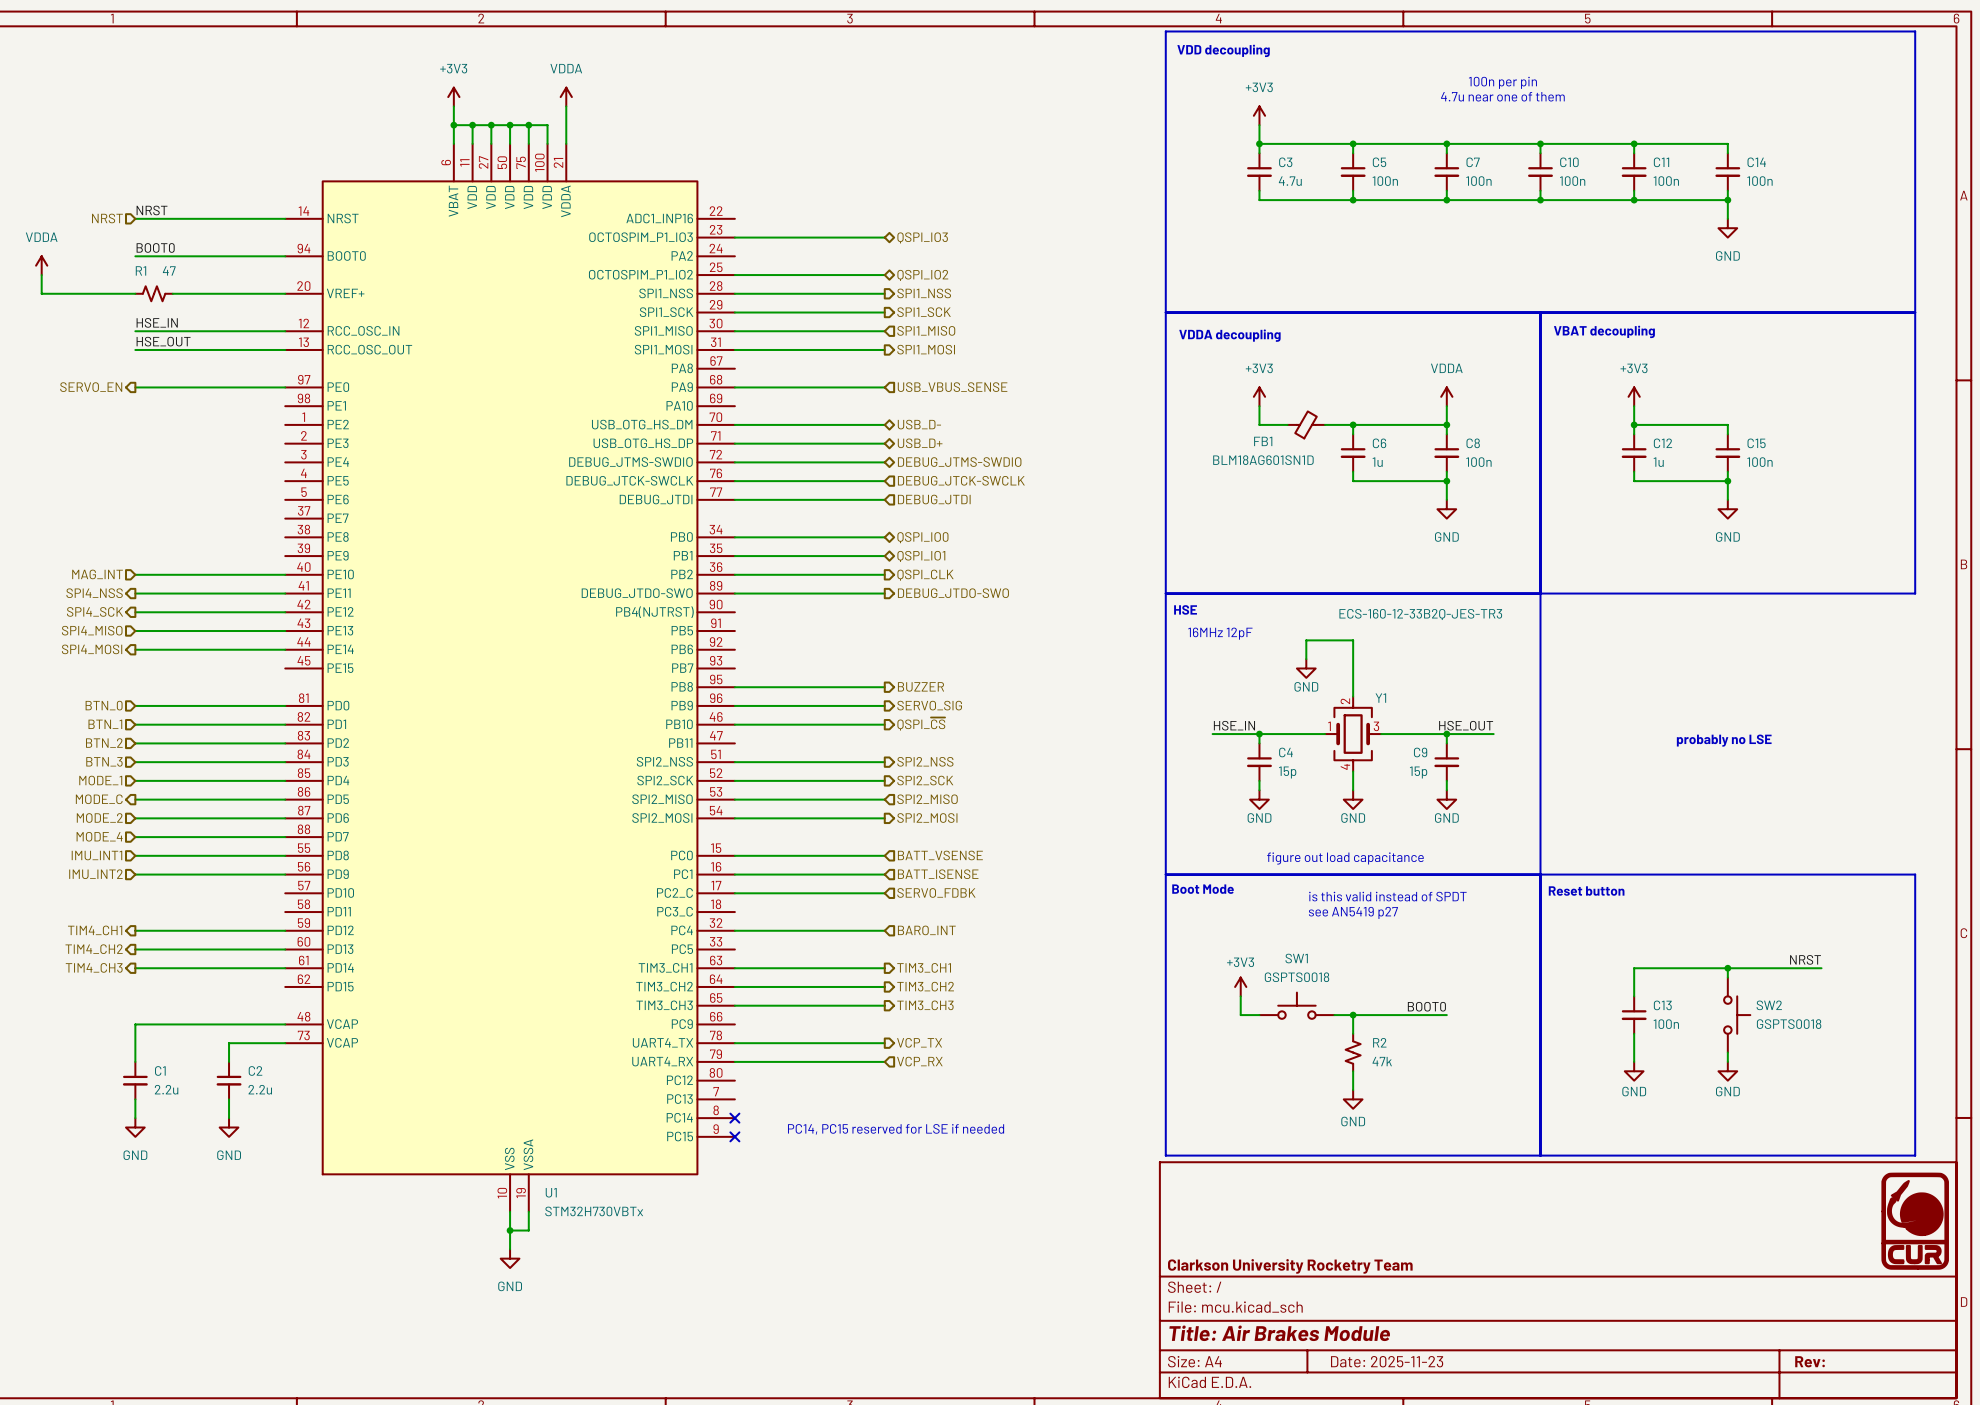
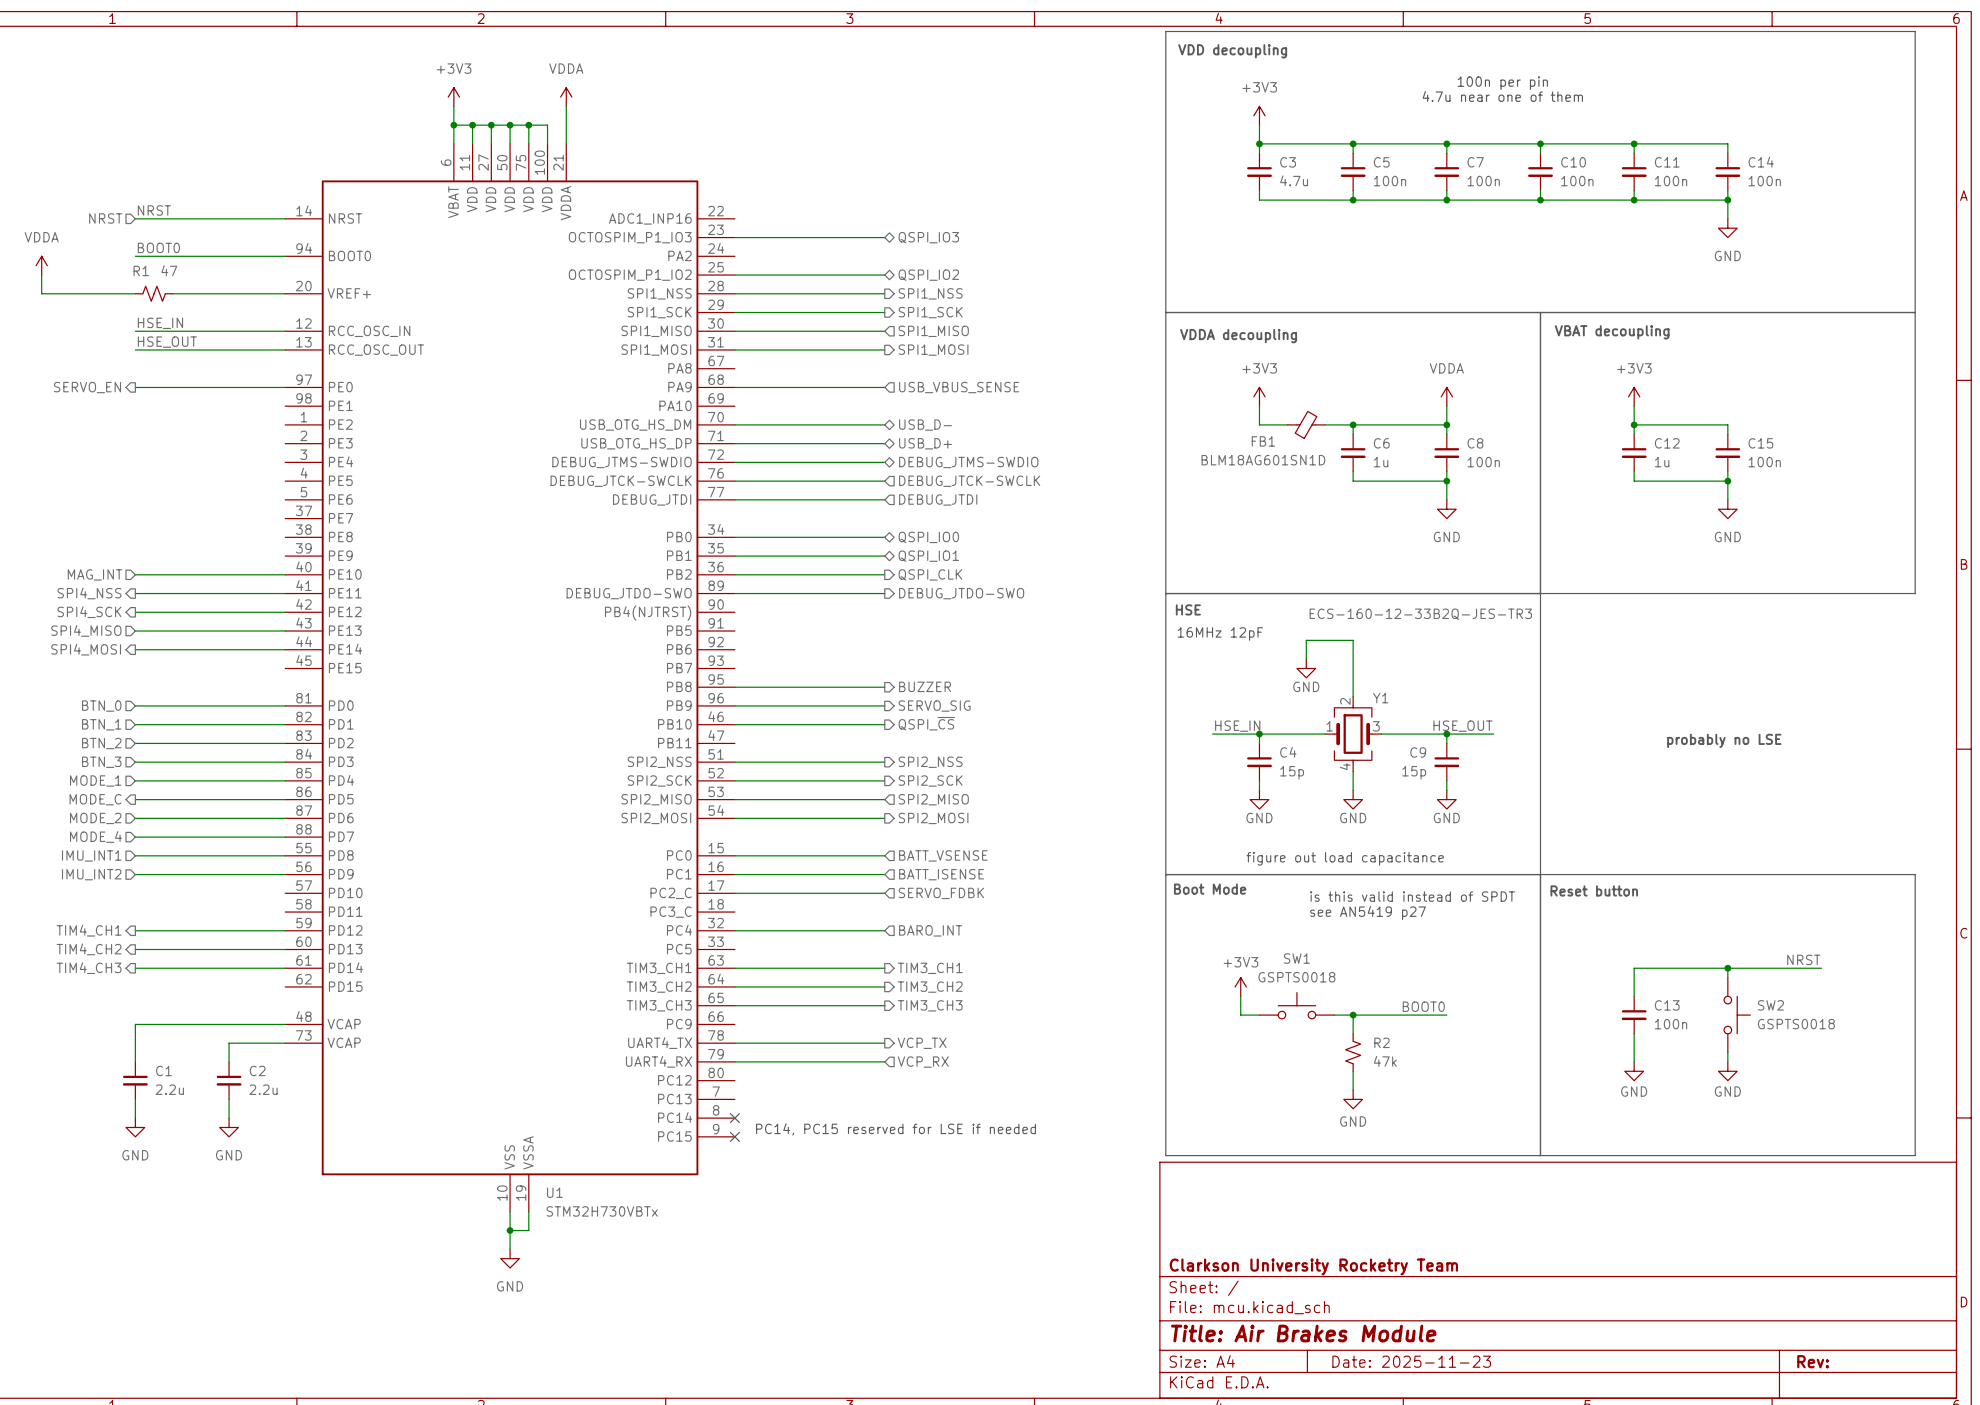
power symbol: (1915, 1221) -> none

